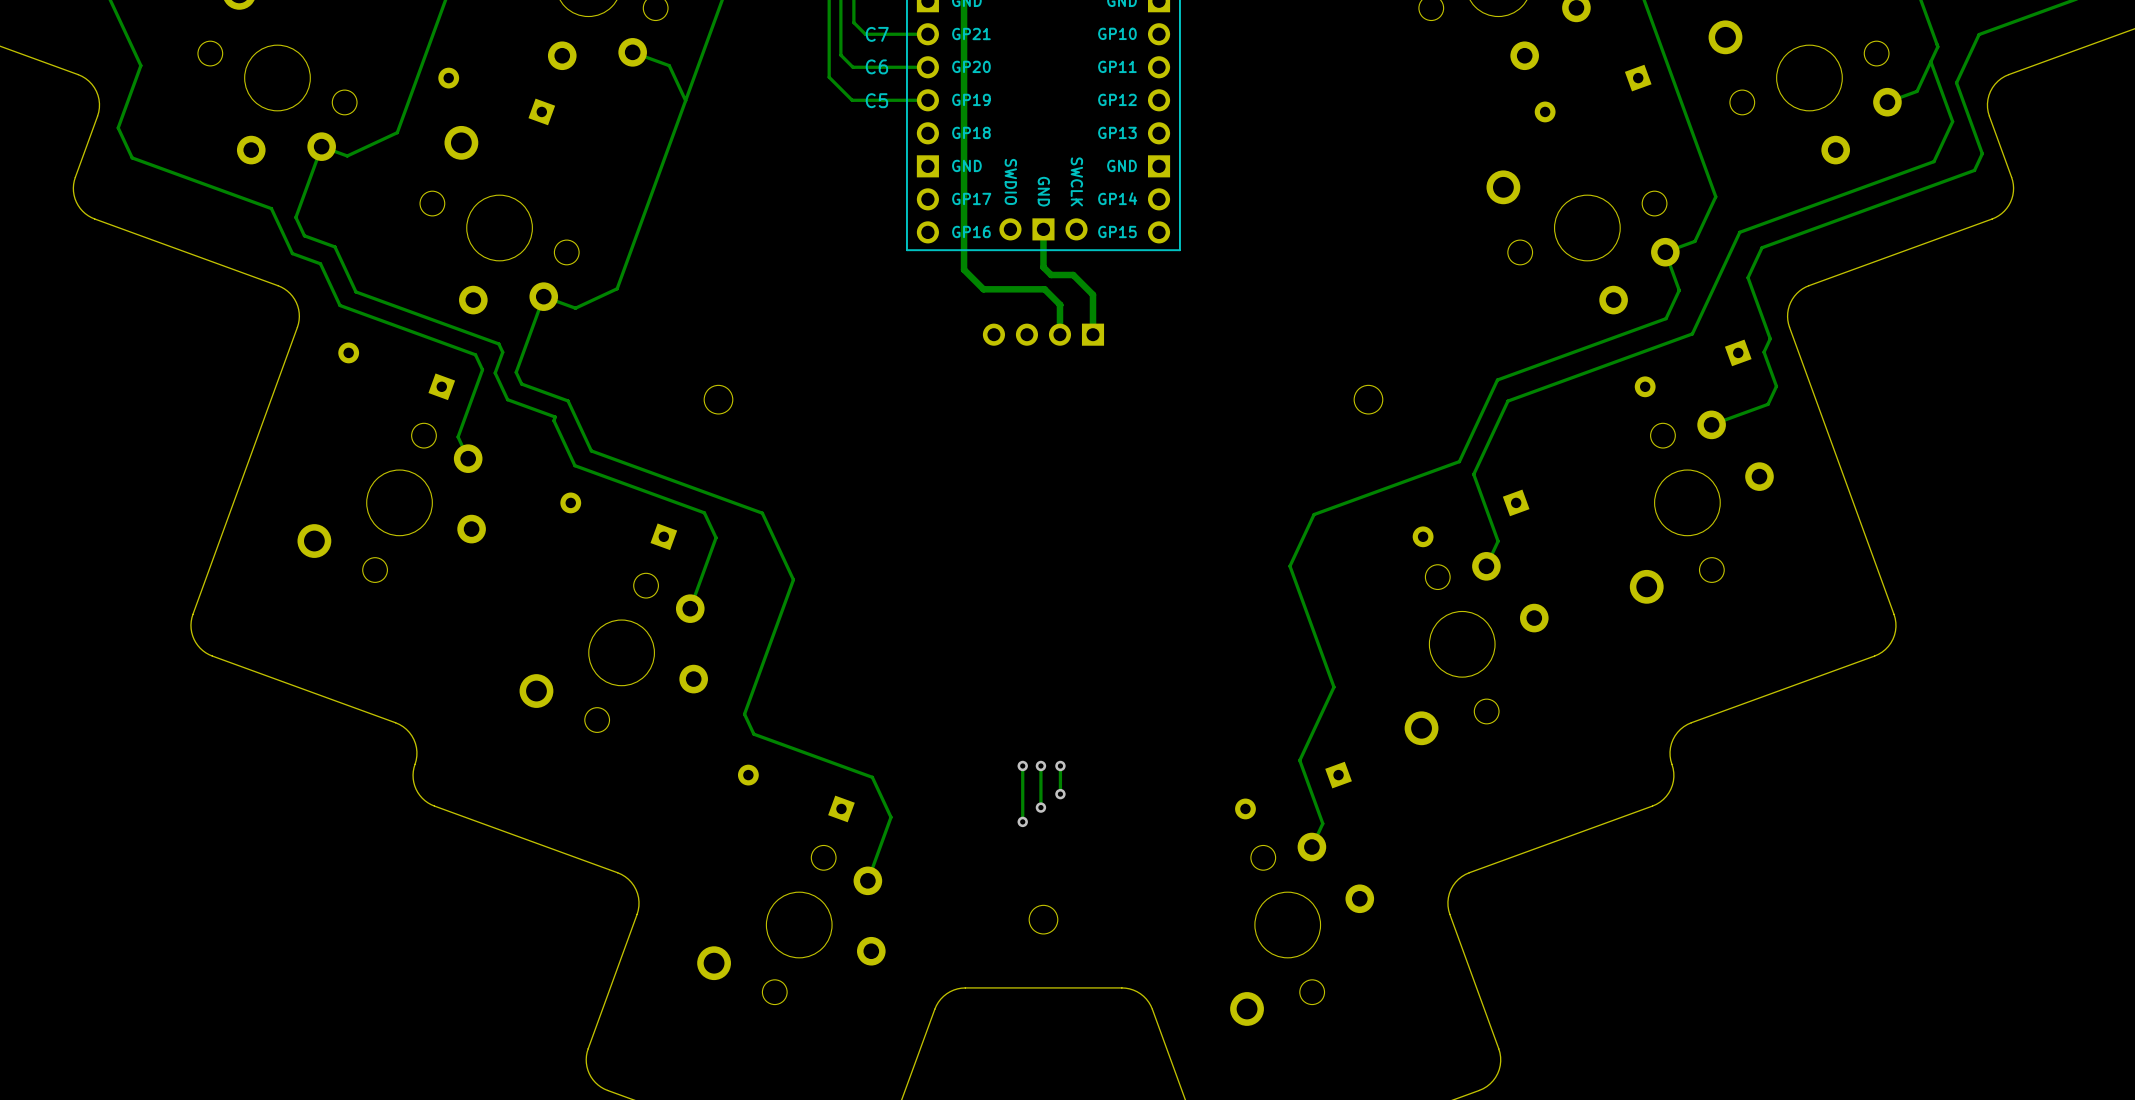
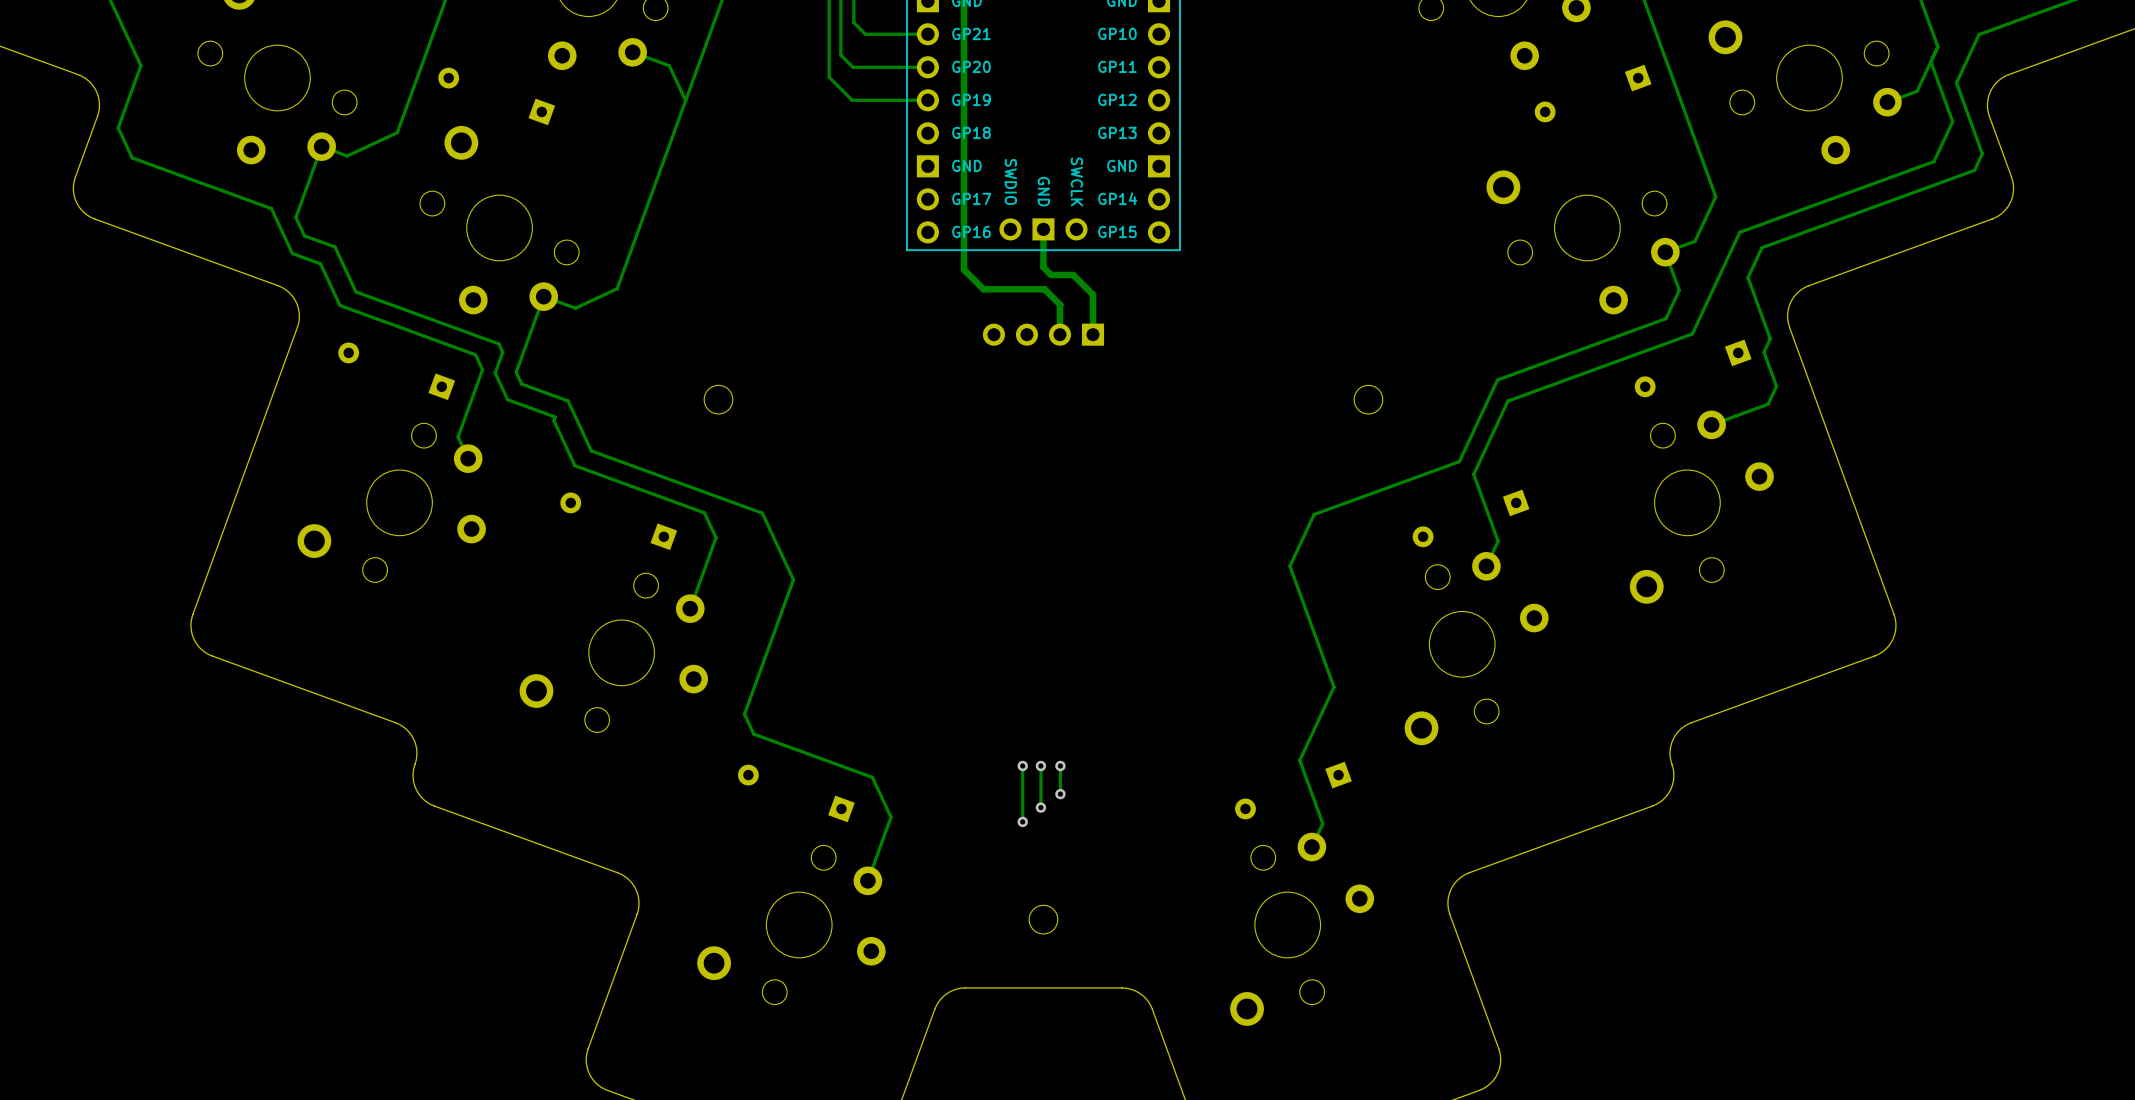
text: C7 (877, 34) -> none
text: C6 (876, 66) -> none
text: C5 (876, 100) -> none

